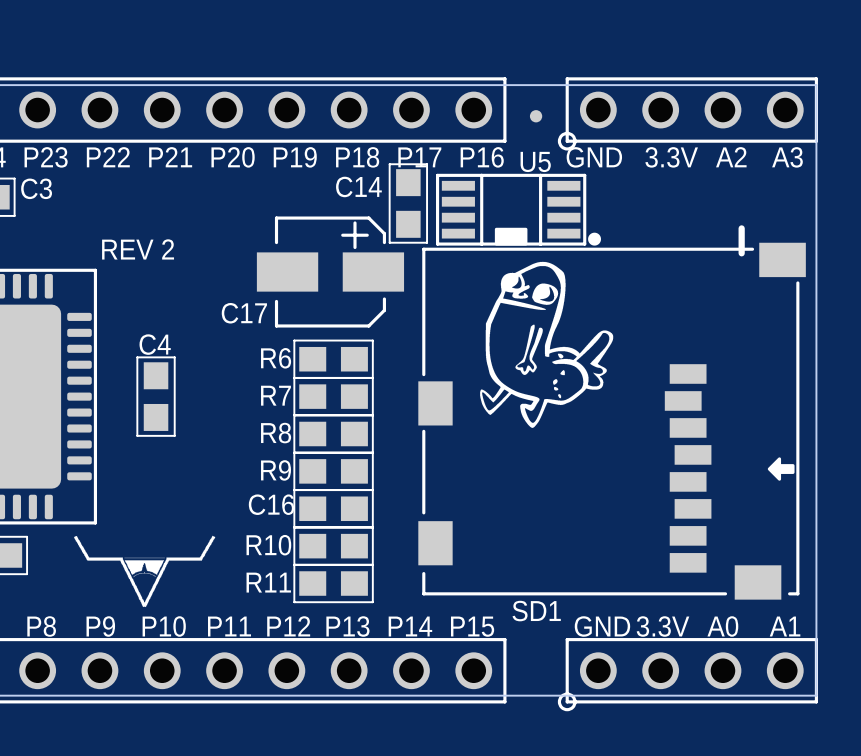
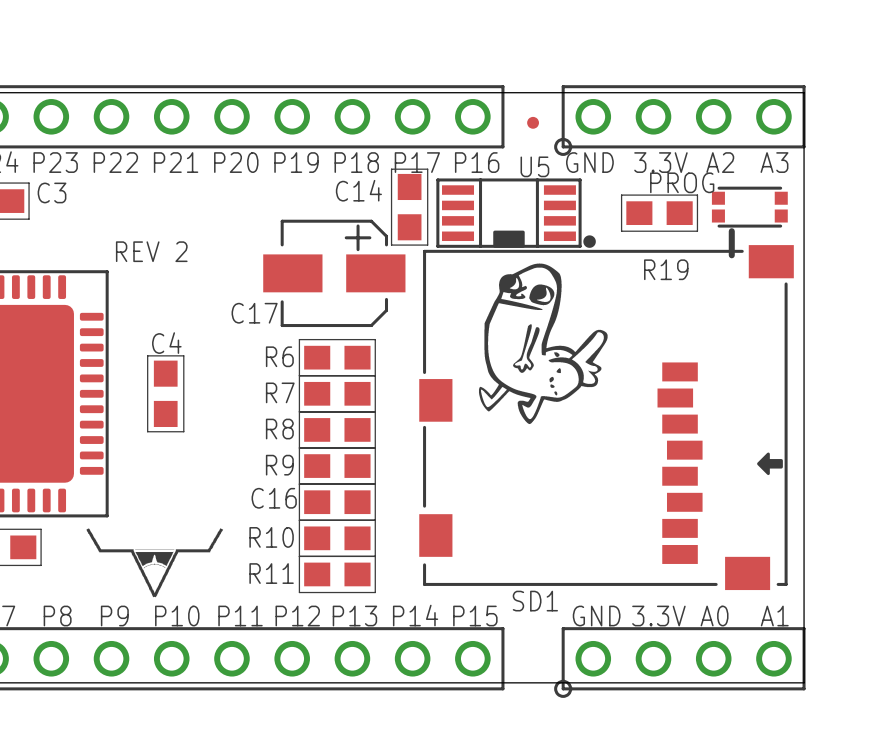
PROG: none -> (749, 207)
R19: none -> (659, 213)

